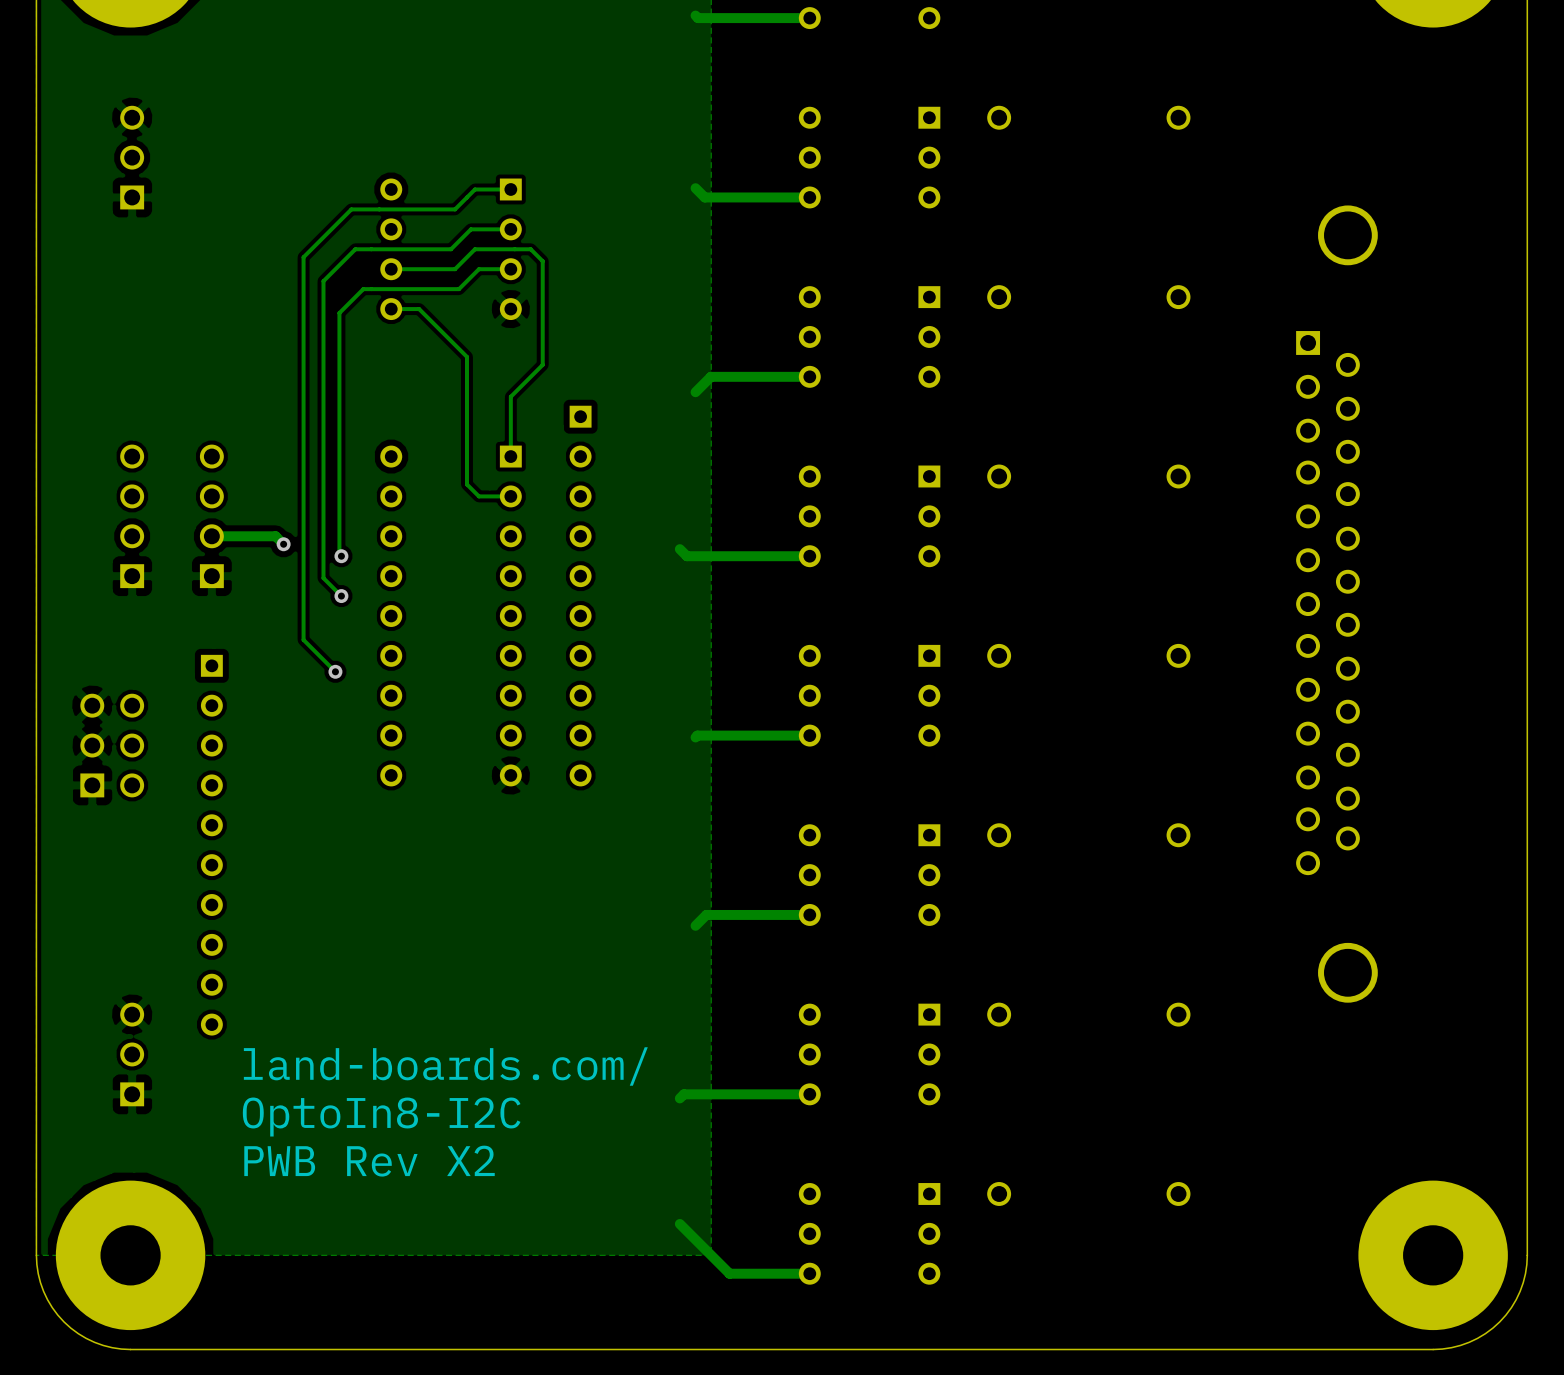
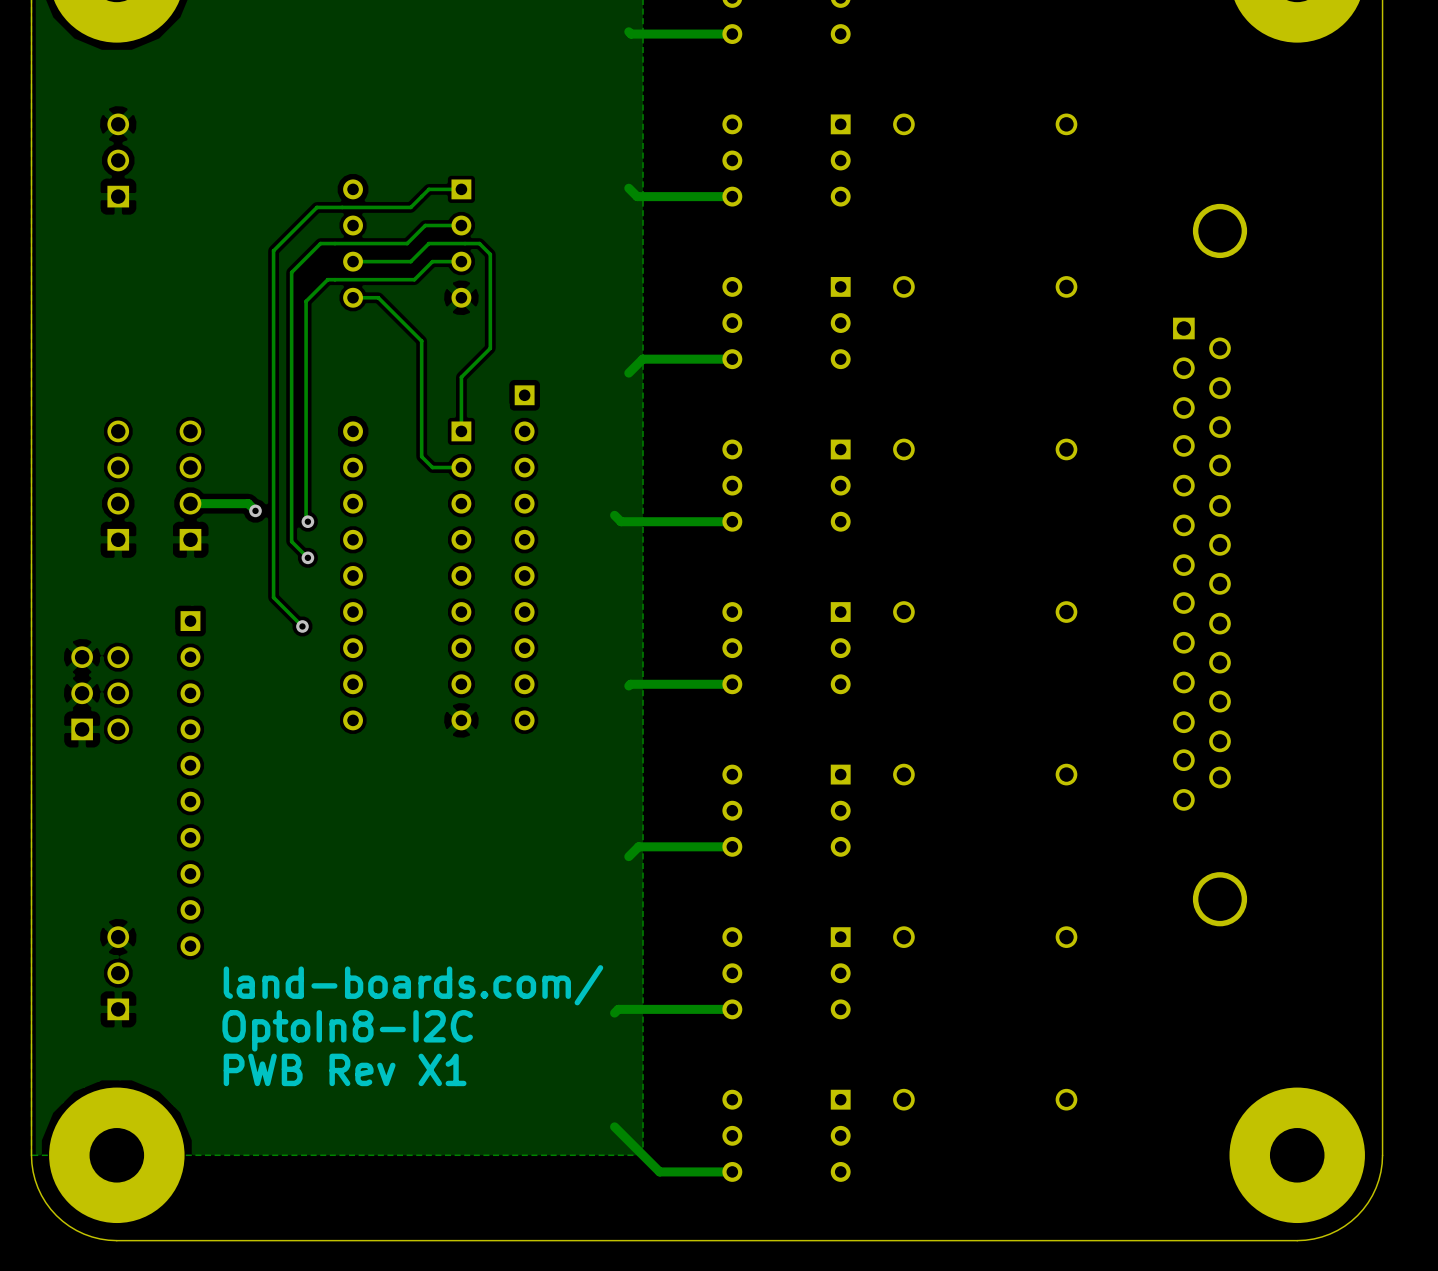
text: PWB Rev X2 (369, 1161) -> PWB Rev X1 (345, 1069)

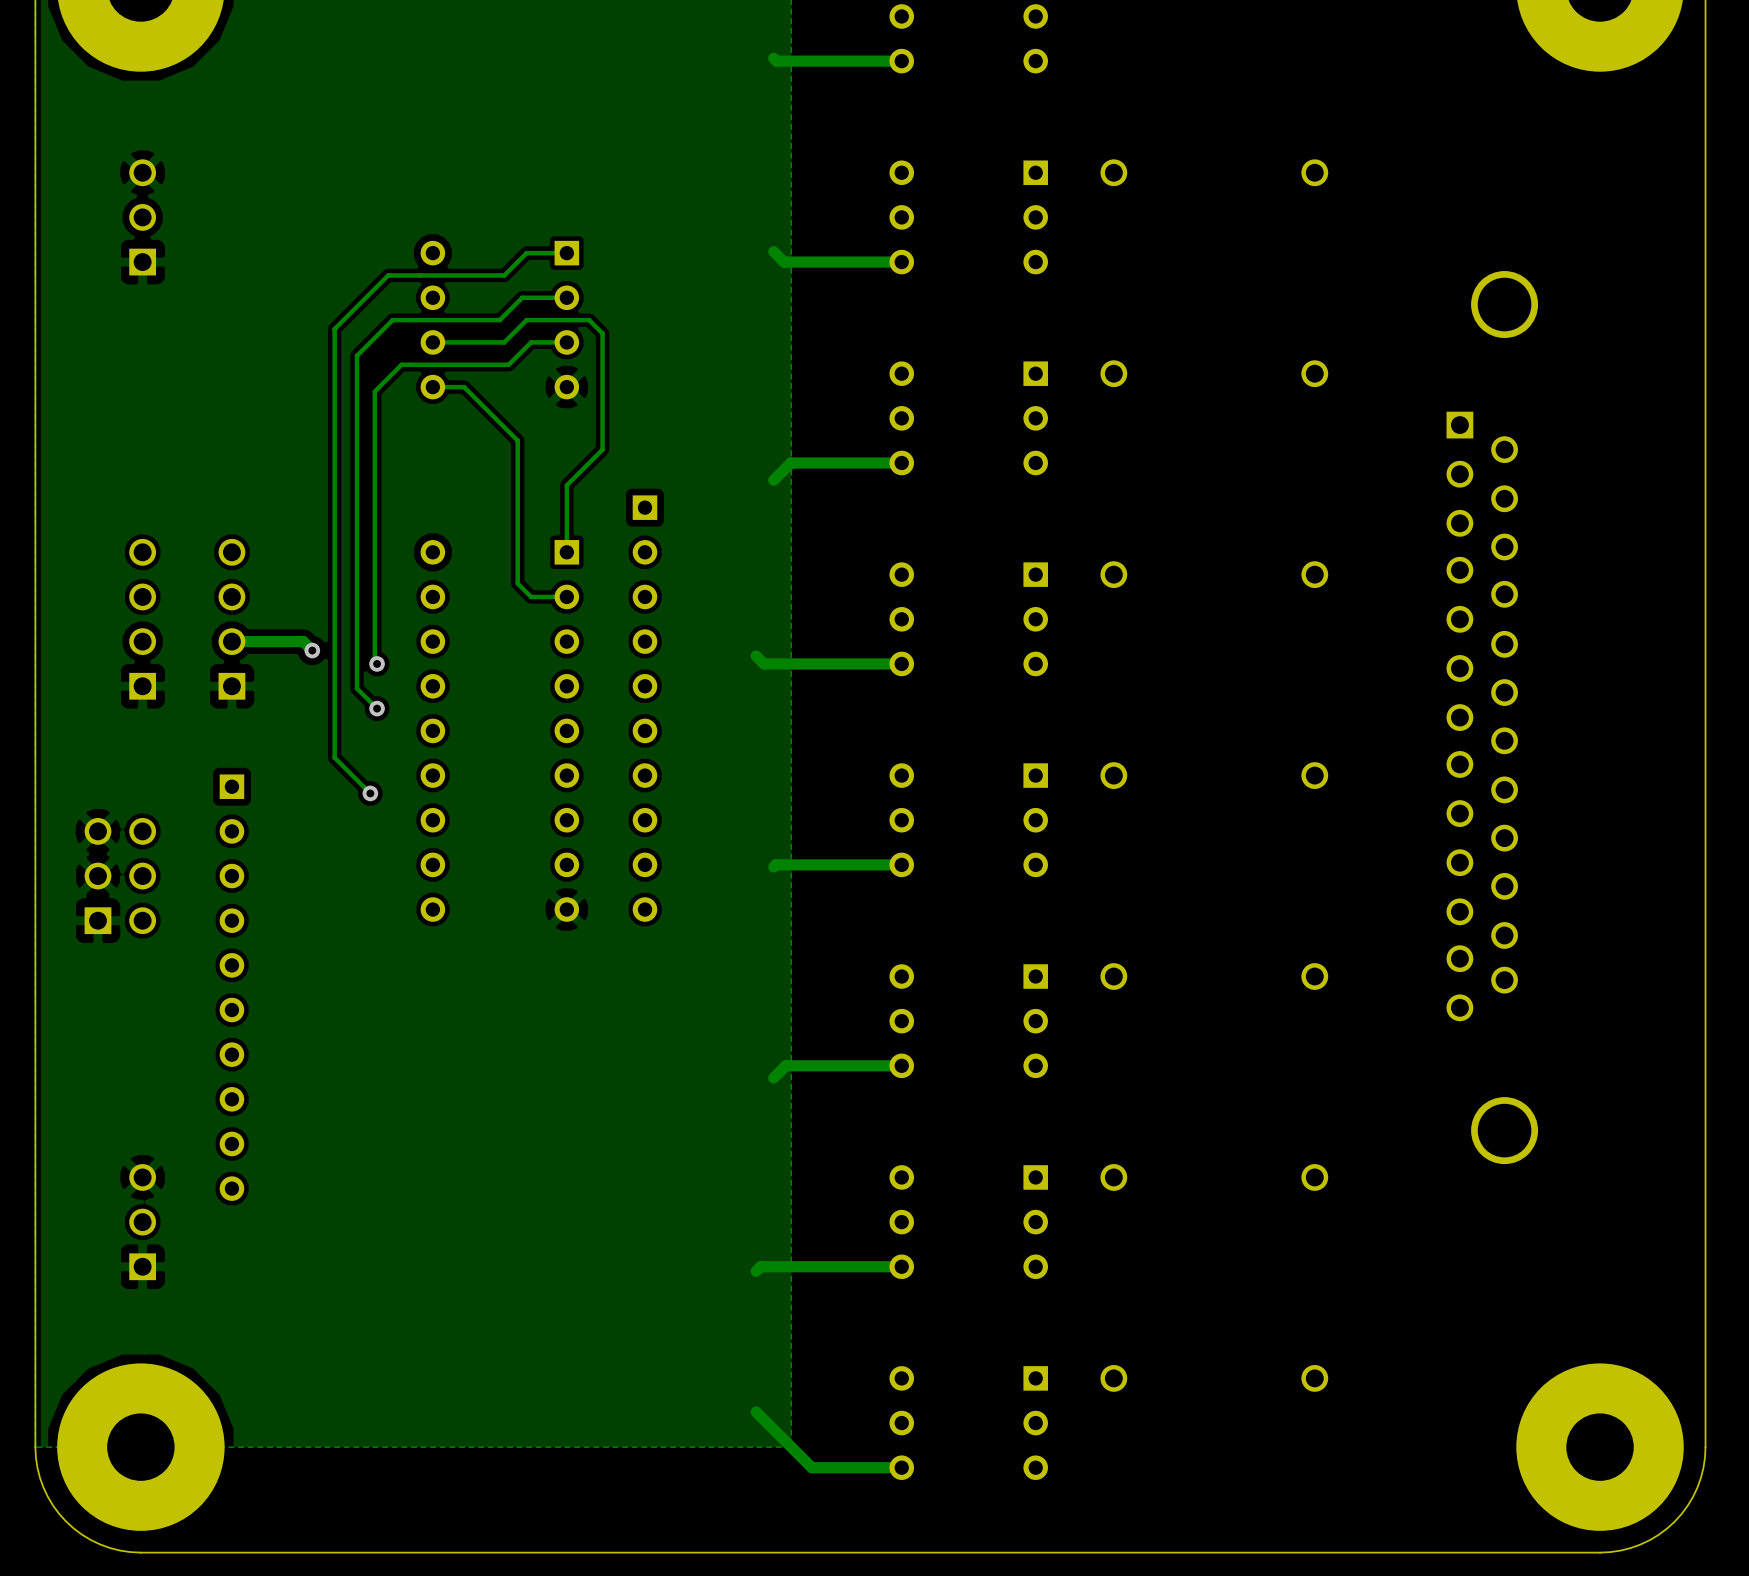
text: land-boards.com/ (413, 985) -> none
text: OptoIn8-I2C (347, 1030) -> none
text: PWB Rev X1 (345, 1069) -> none

